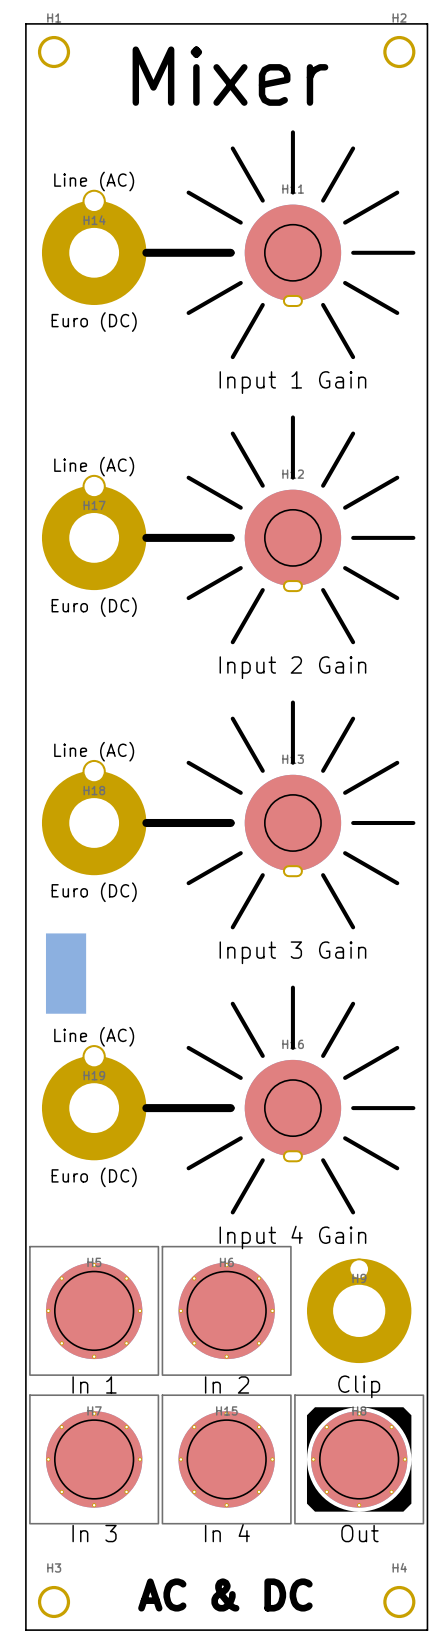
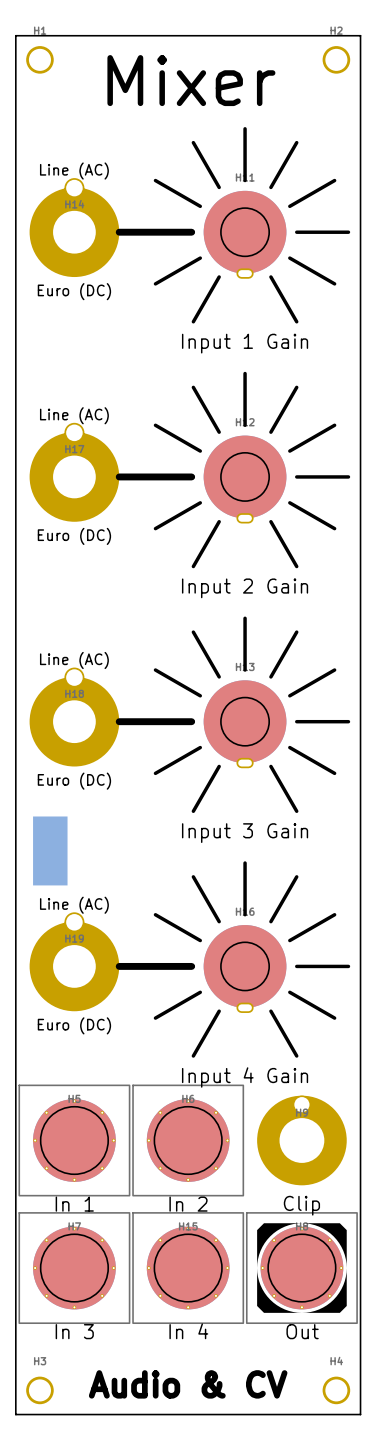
text: AC & DC (225, 1594) -> Audio & CV (188, 1384)

